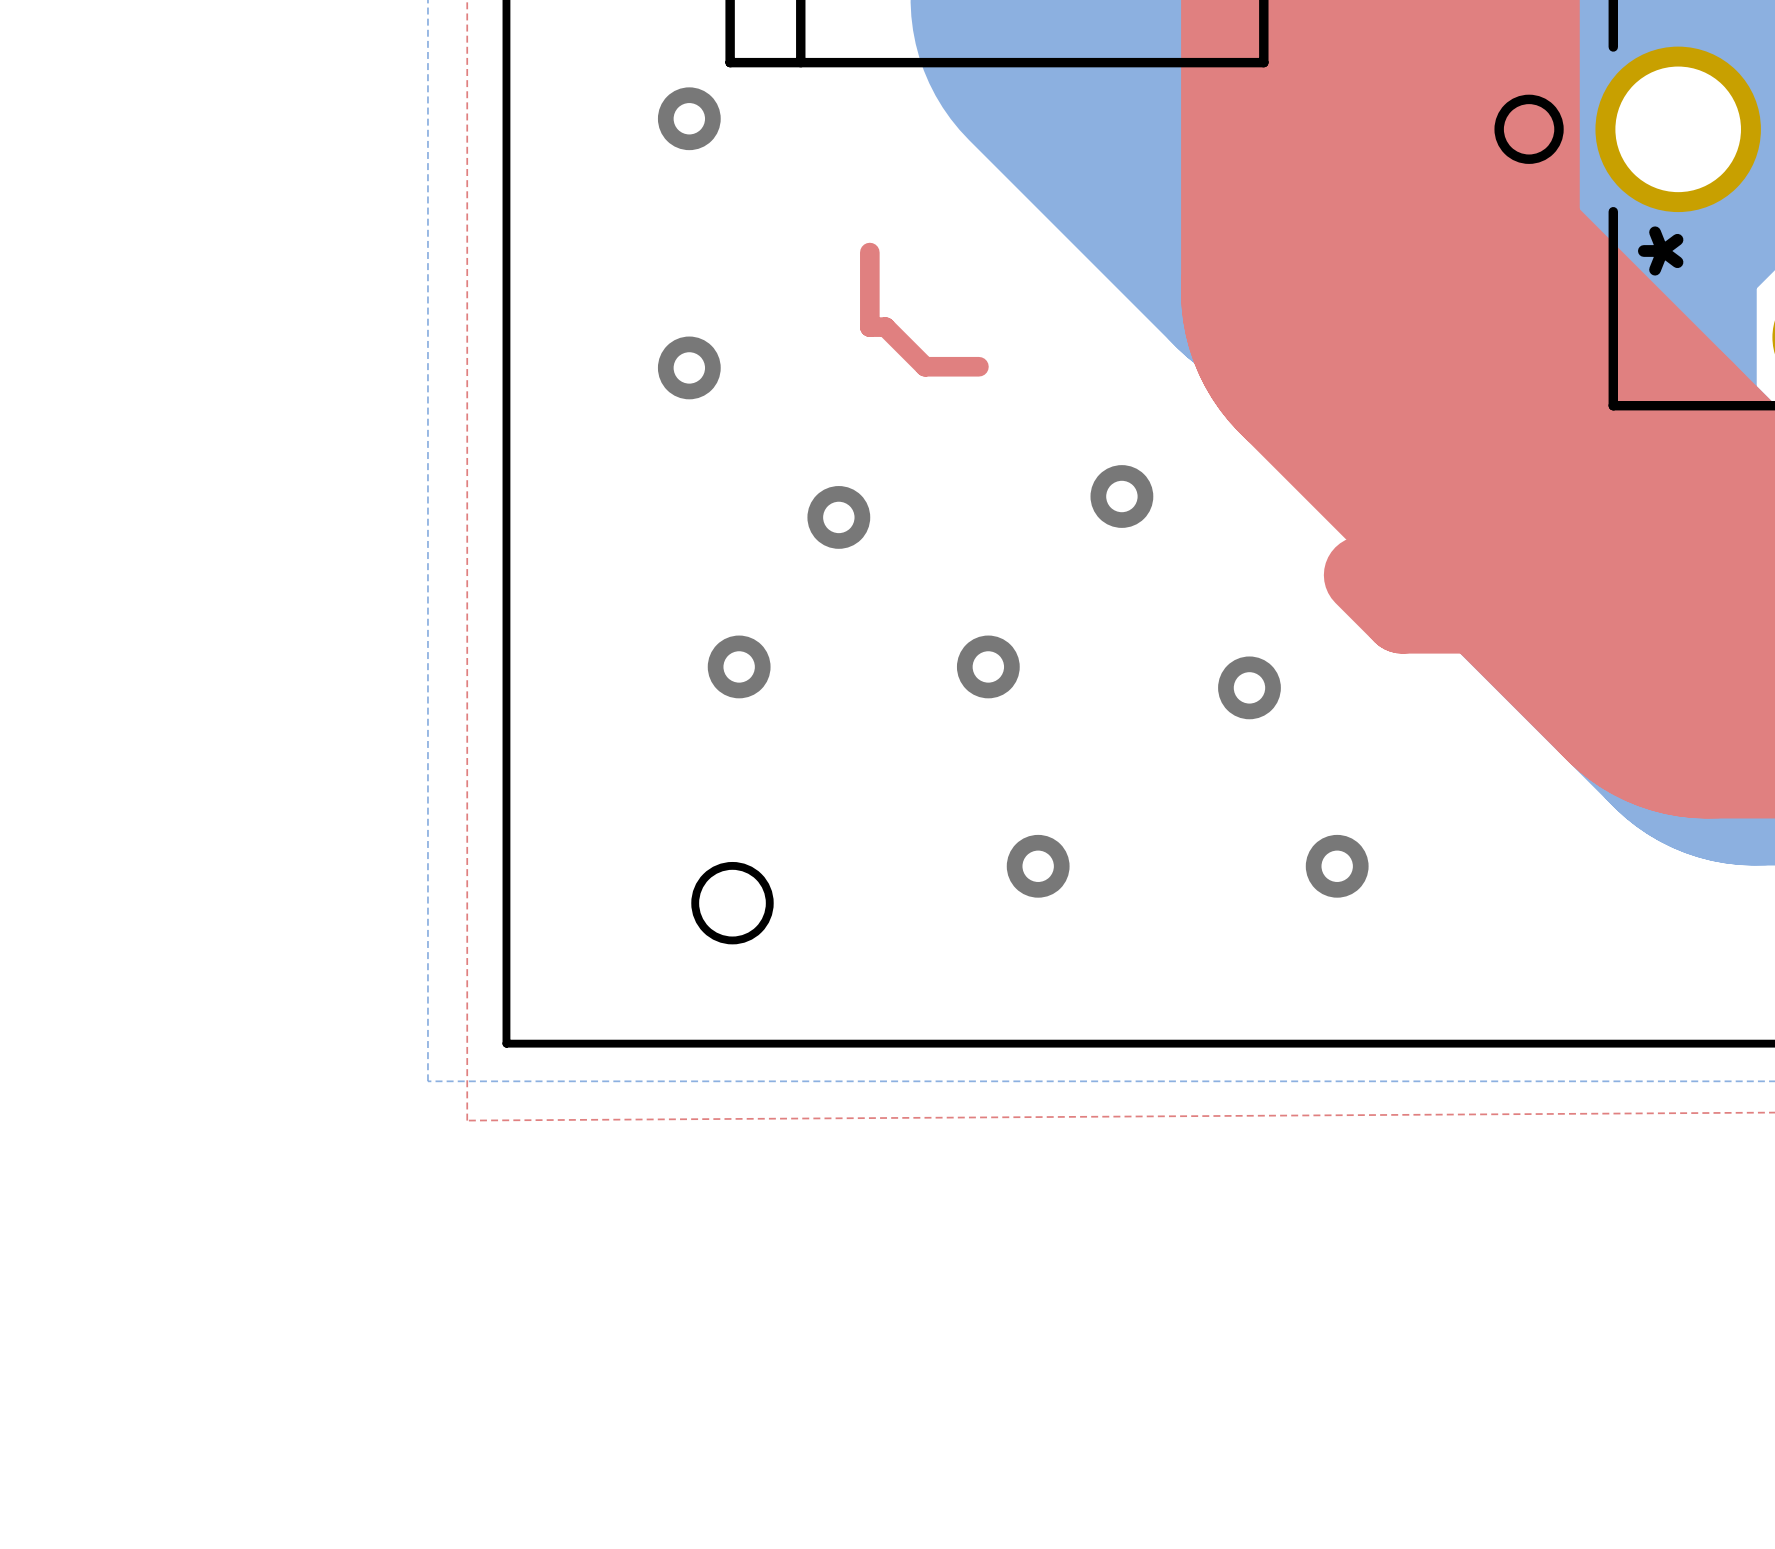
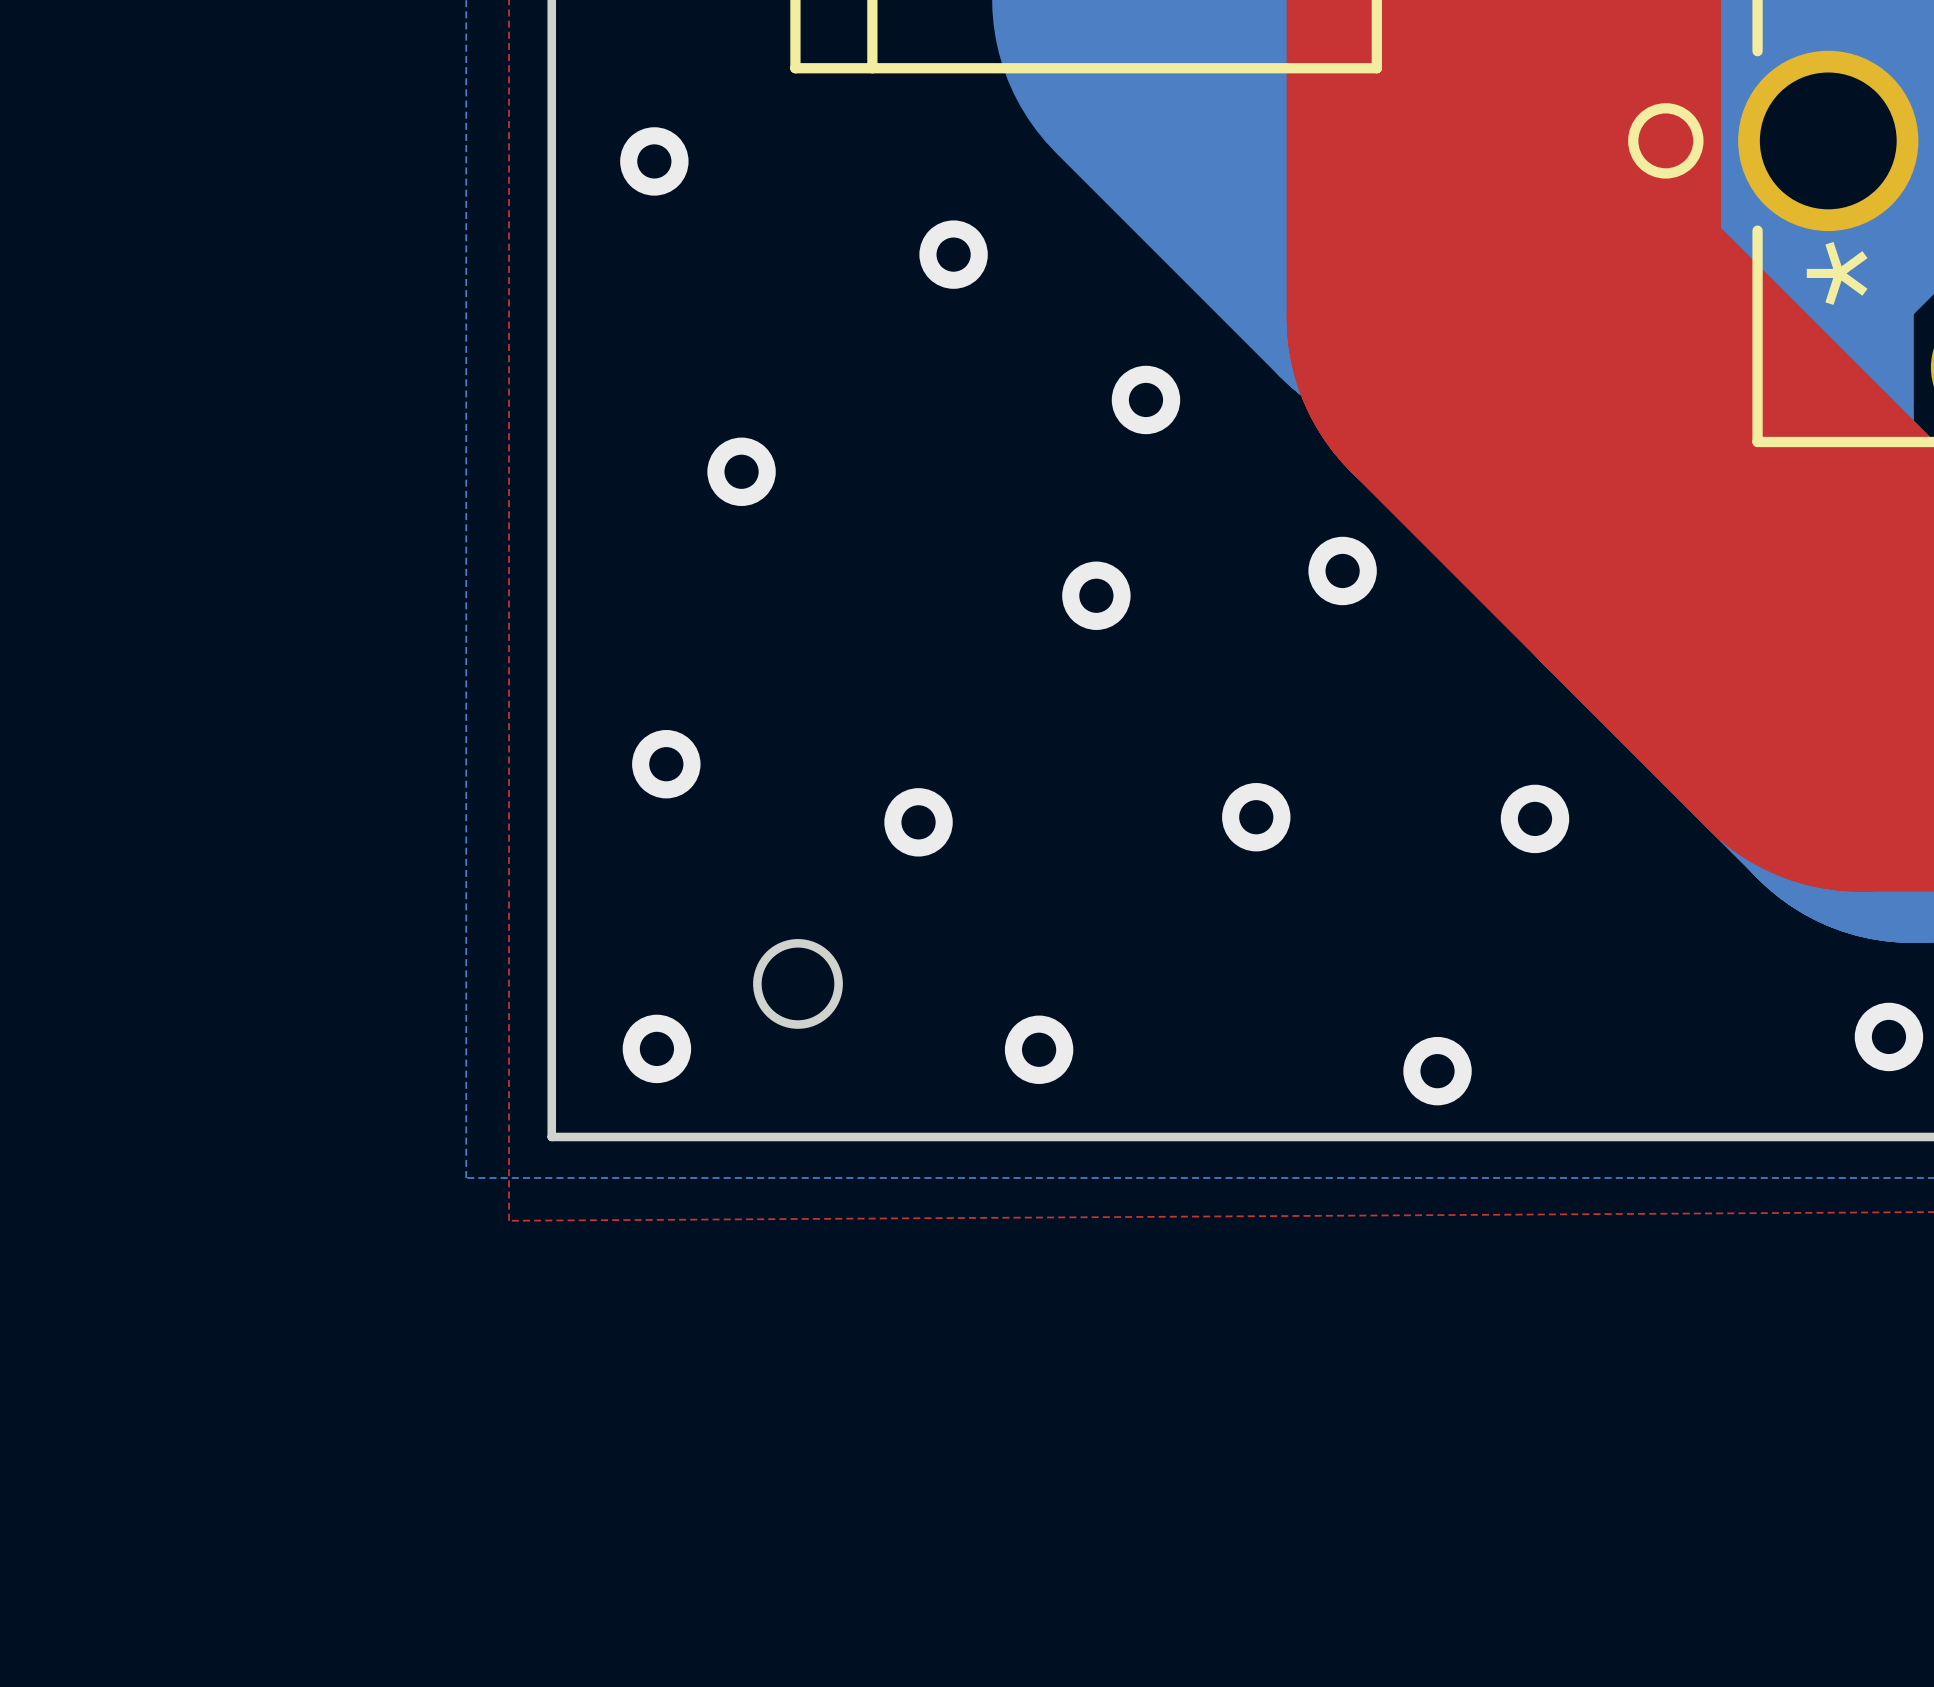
via: (689, 118) -> none
via: none -> (654, 161)
via: none -> (953, 254)
top track: (869, 252) (869, 327) (885, 327) (925, 366) (978, 366) -> none
via position: (689, 367) -> (741, 471)
via: none -> (1145, 399)
via: (1121, 496) -> none
via: (838, 517) -> none
via: none -> (1342, 570)
via: none -> (1096, 595)
top track: (1663, 575) (1363, 575) (1402, 614) (1480, 614) -> none
via: (739, 666) -> none
via: (988, 666) -> none
via: (1249, 687) -> none
via: none -> (666, 764)
via: none -> (1256, 817)
via: none -> (1535, 818)
via: none -> (918, 822)
via: (1038, 866) -> none
via: (1337, 866) -> none
via: none -> (1888, 1036)
via: none -> (656, 1048)
via: none -> (1039, 1049)
via: none -> (1437, 1071)

